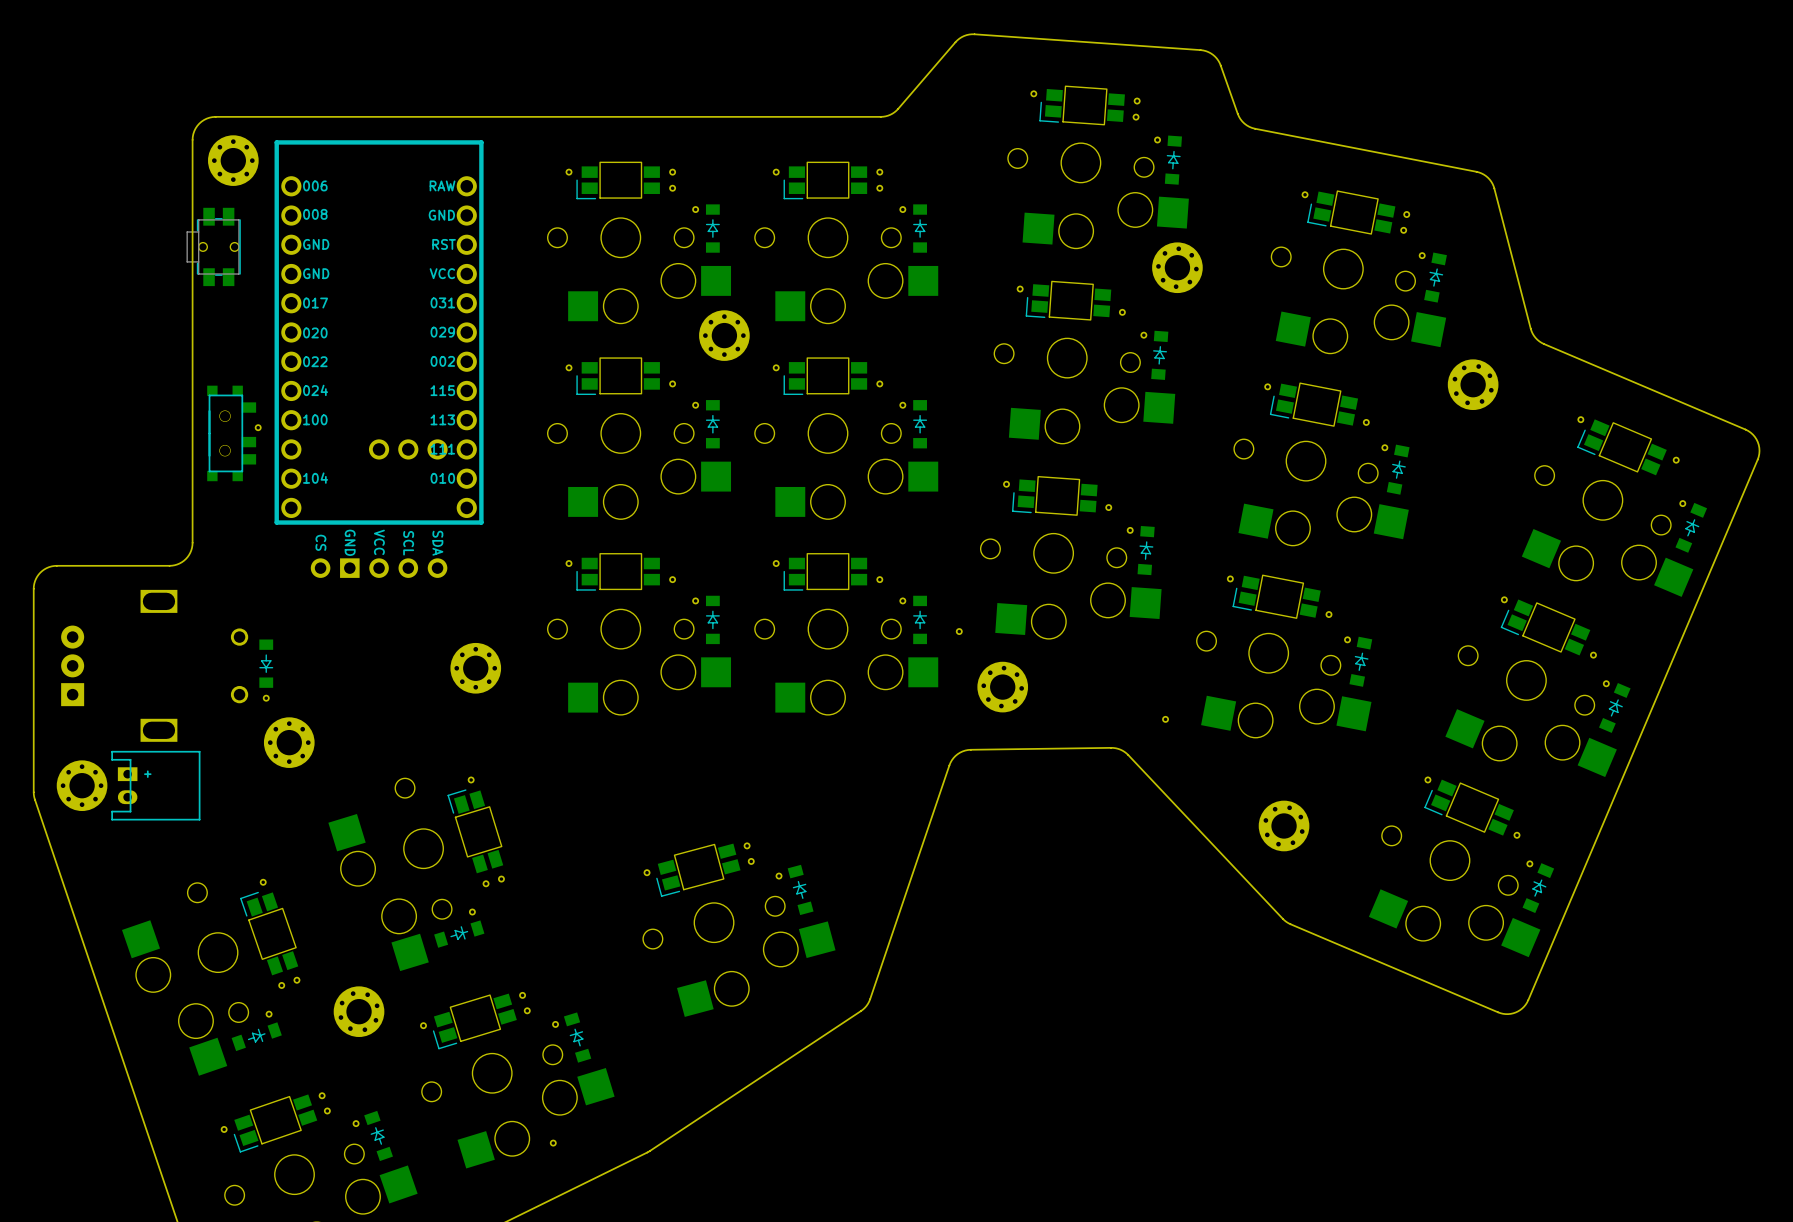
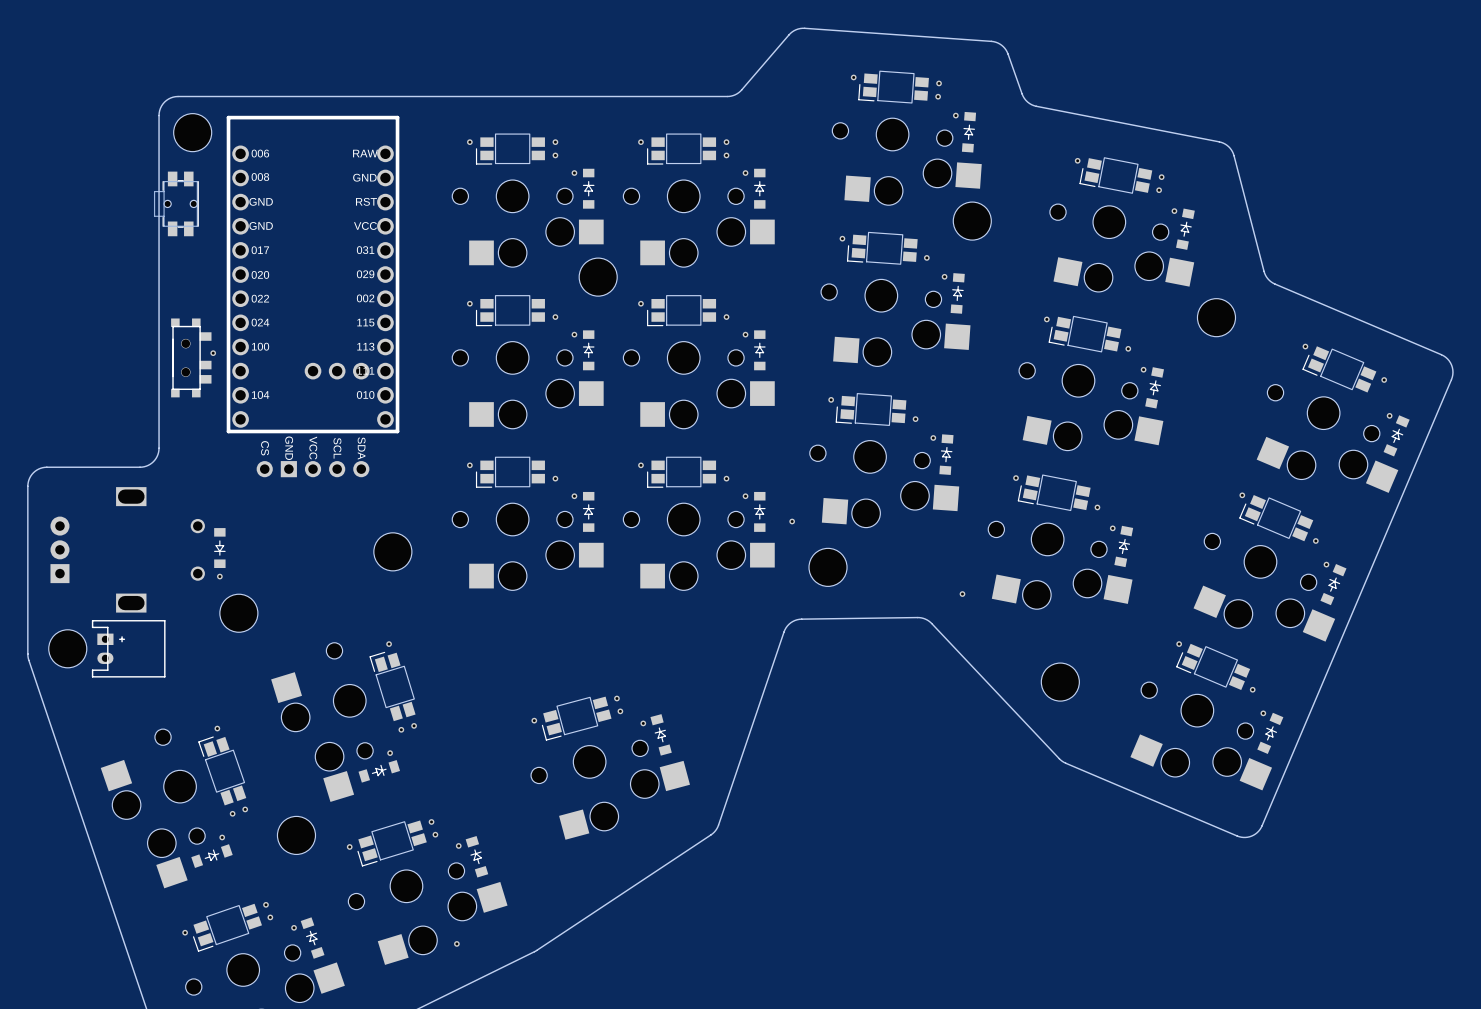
part footprint: [208, 135, 259, 186] -> [173, 113, 212, 152]
part footprint: [1152, 242, 1203, 294] -> [953, 202, 992, 241]
part footprint: [699, 310, 750, 361] -> [579, 258, 618, 297]
part footprint: [1447, 359, 1499, 411] -> [1197, 298, 1236, 337]
part footprint: [450, 642, 502, 694] -> [373, 532, 412, 571]
part footprint: [977, 661, 1029, 713] -> [809, 548, 848, 587]
part footprint: [263, 717, 315, 768] -> [219, 594, 258, 633]
part footprint: [56, 760, 108, 812] -> [48, 629, 87, 668]
part footprint: [1258, 800, 1310, 852] -> [1041, 663, 1080, 702]
part footprint: [333, 986, 385, 1038] -> [277, 816, 316, 855]

